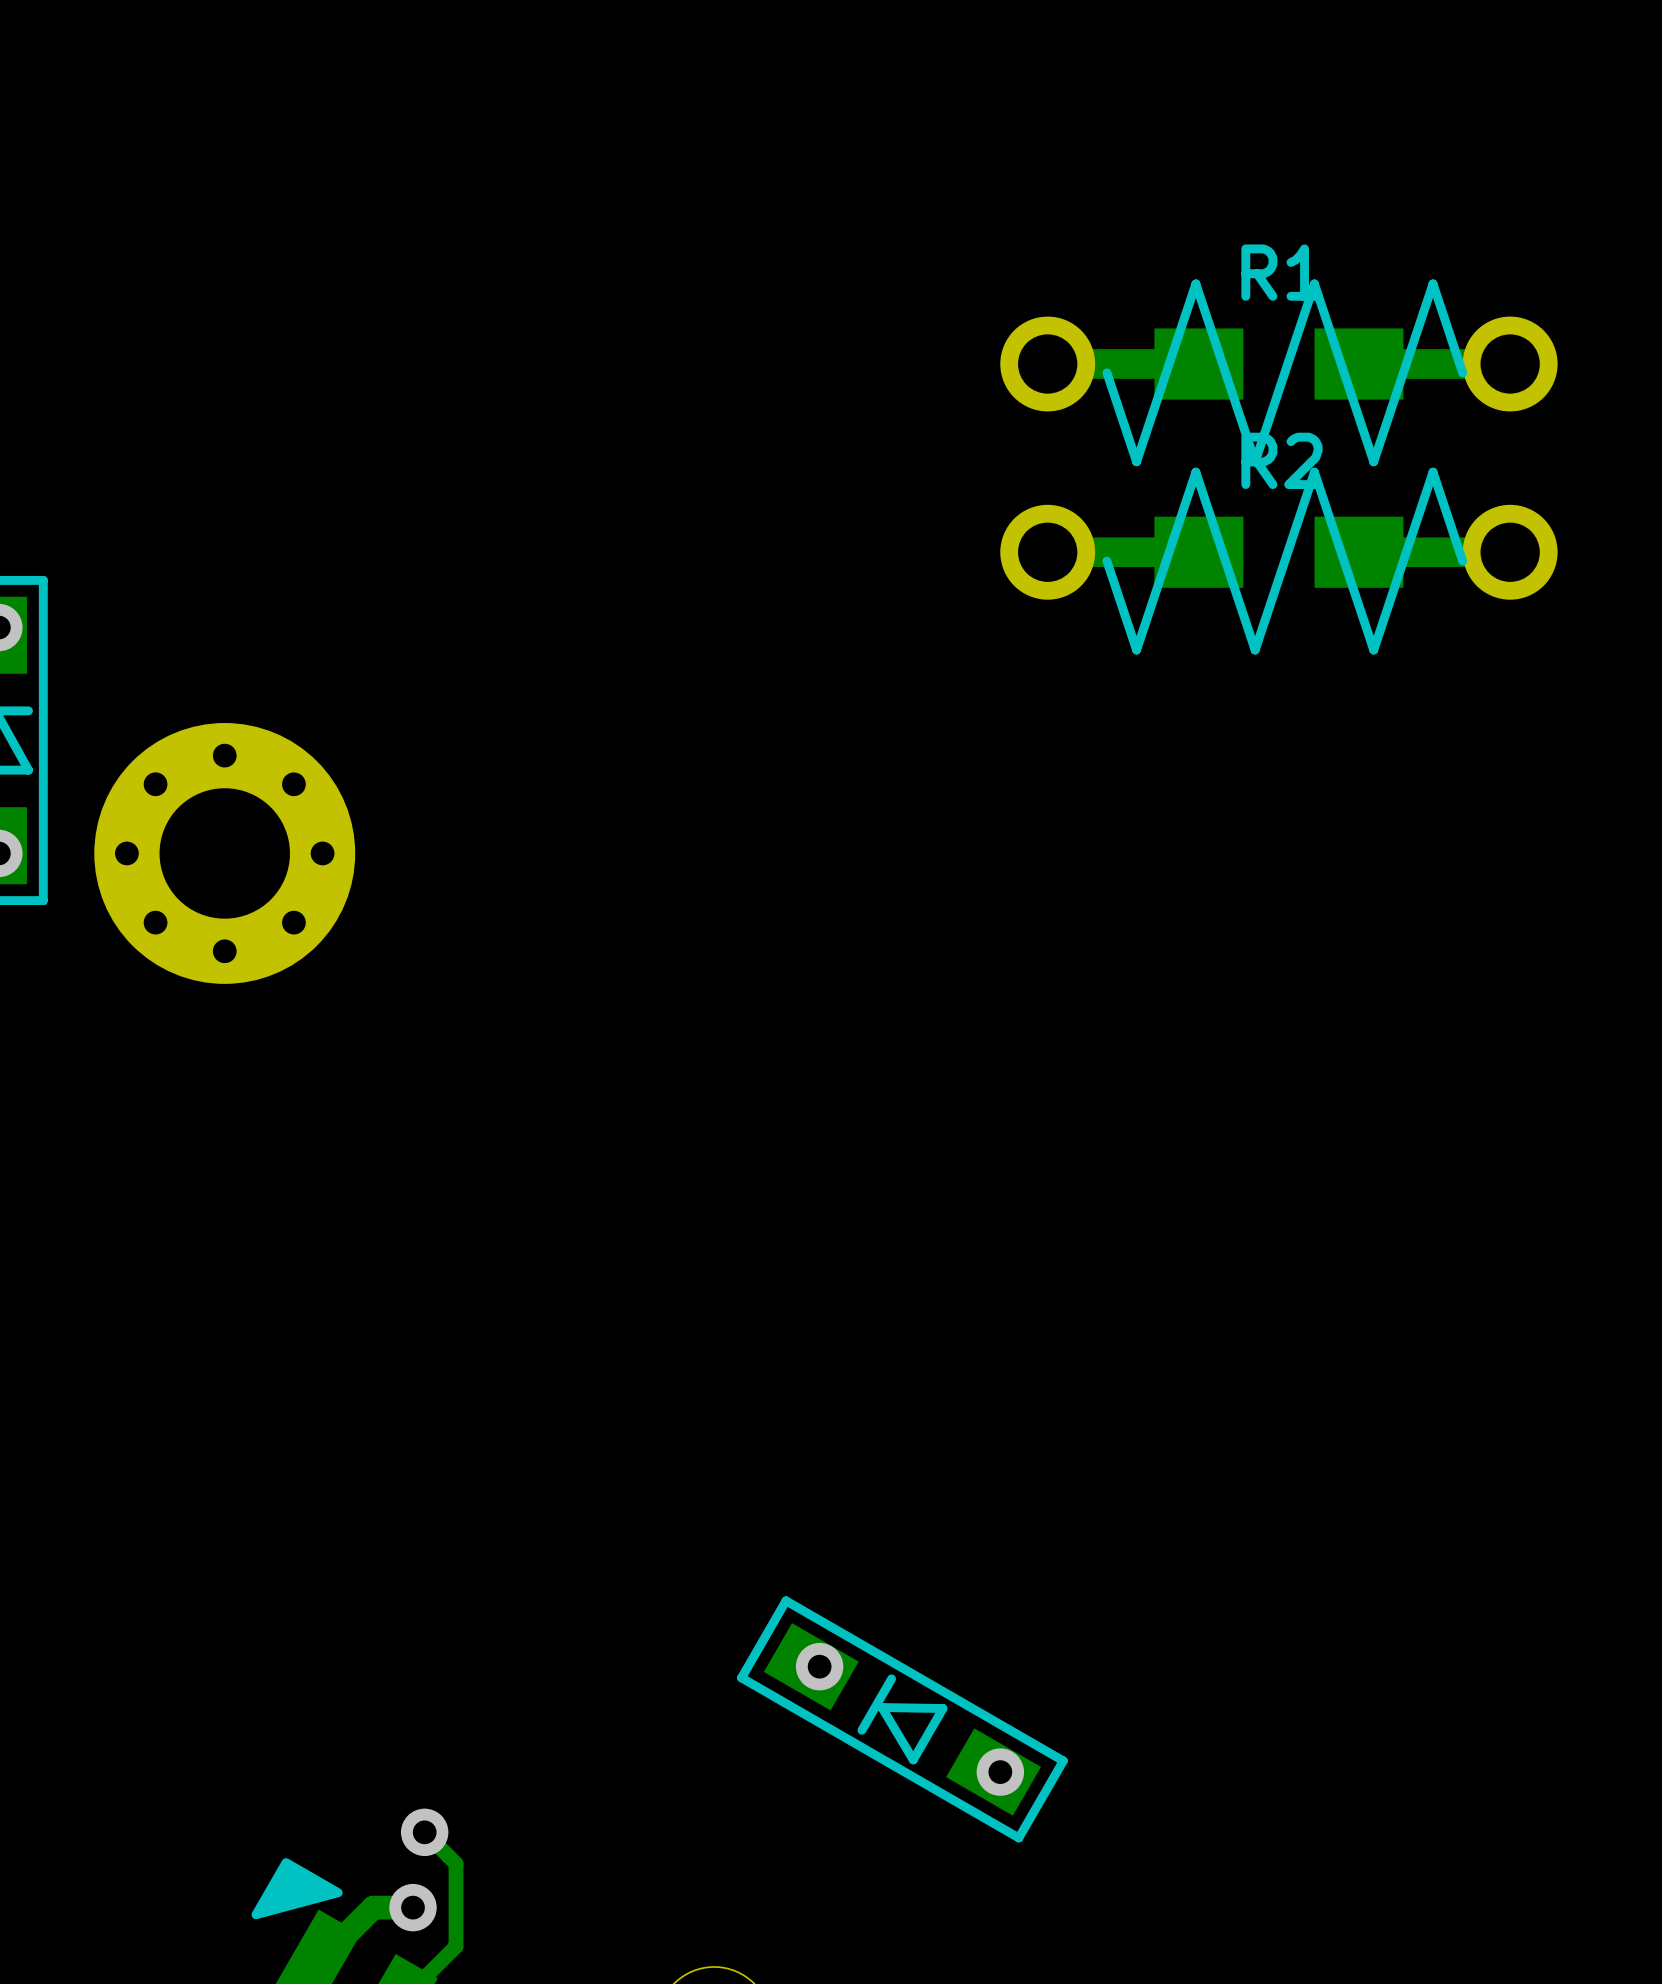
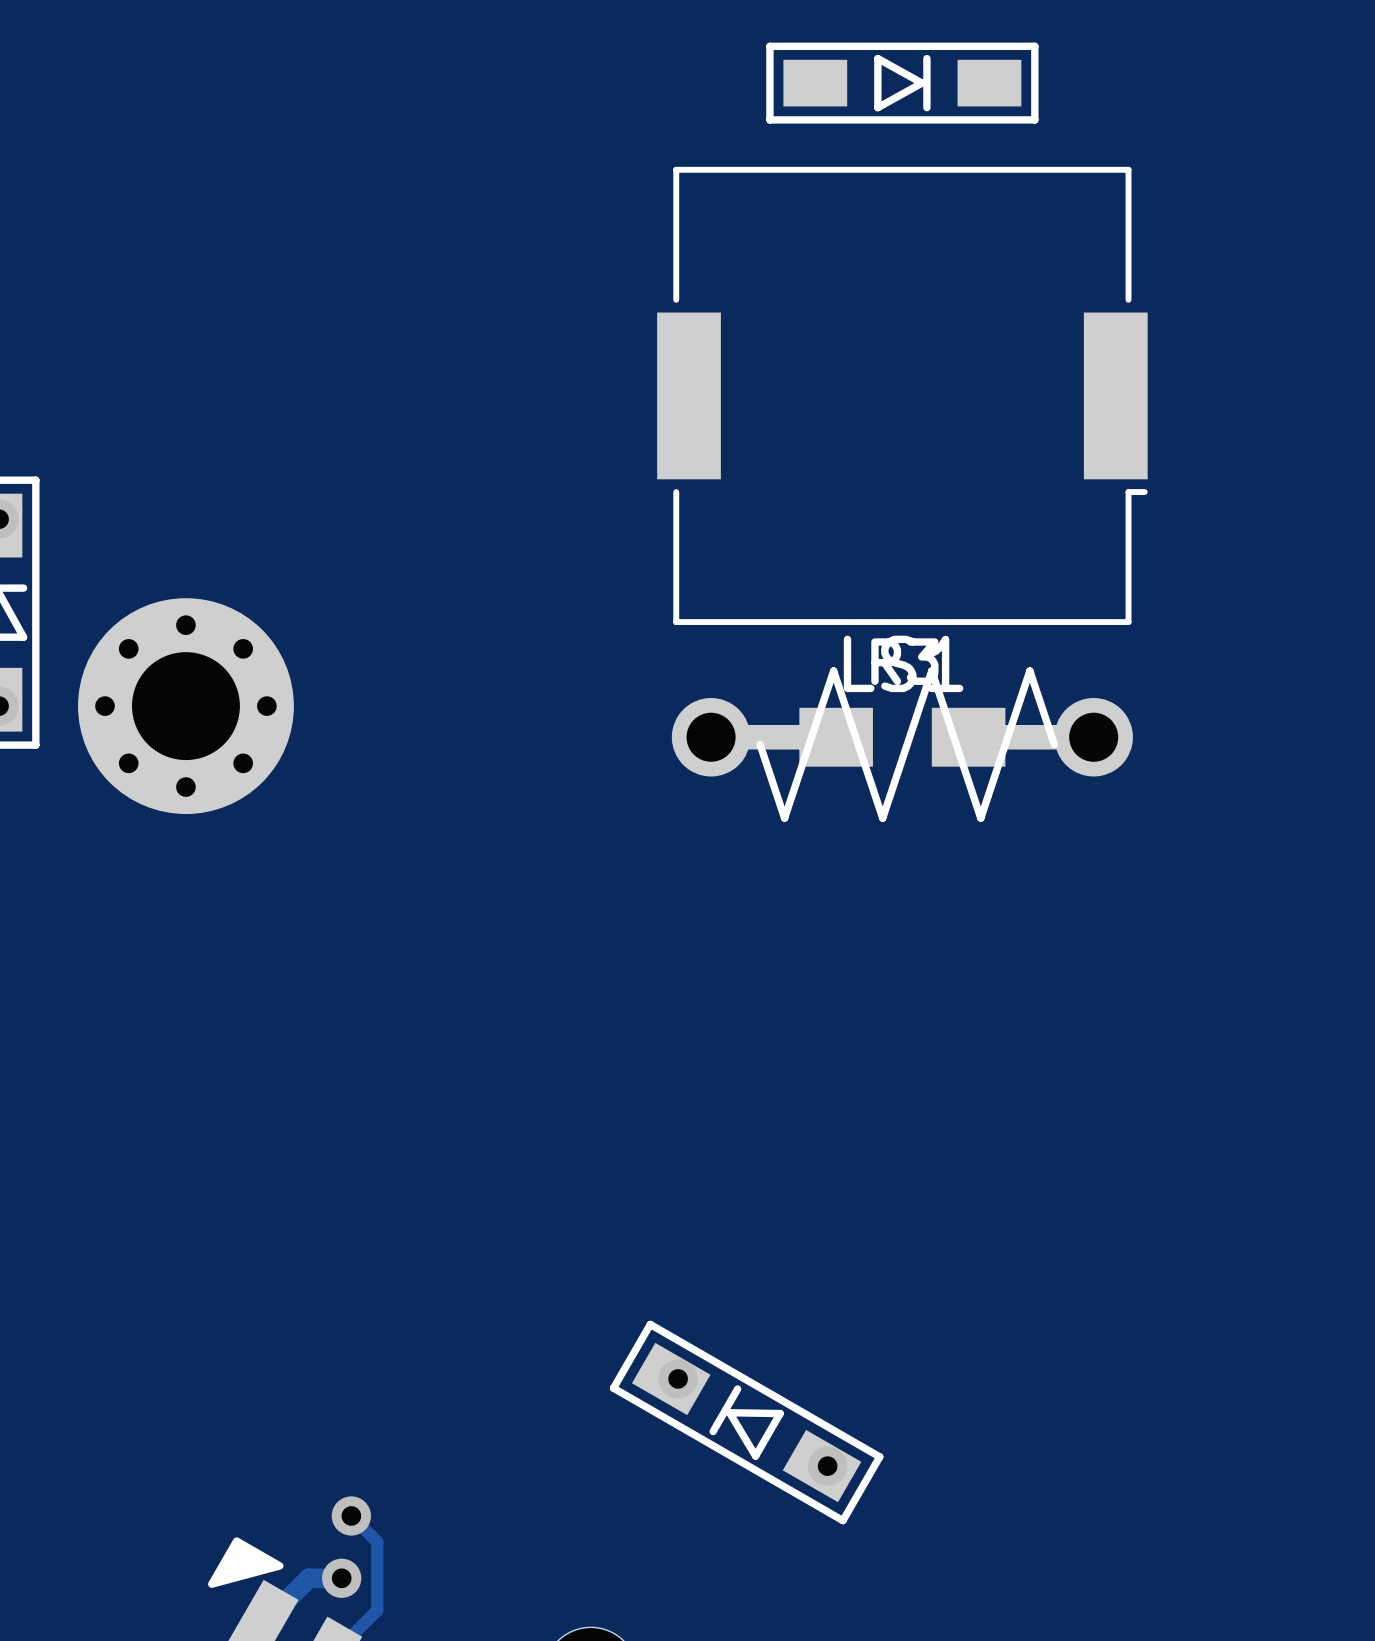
part: none -> (902, 83)
part: (1278, 372) -> none
part: none -> (902, 395)
part: (1278, 561) -> none
part: none -> (902, 744)

